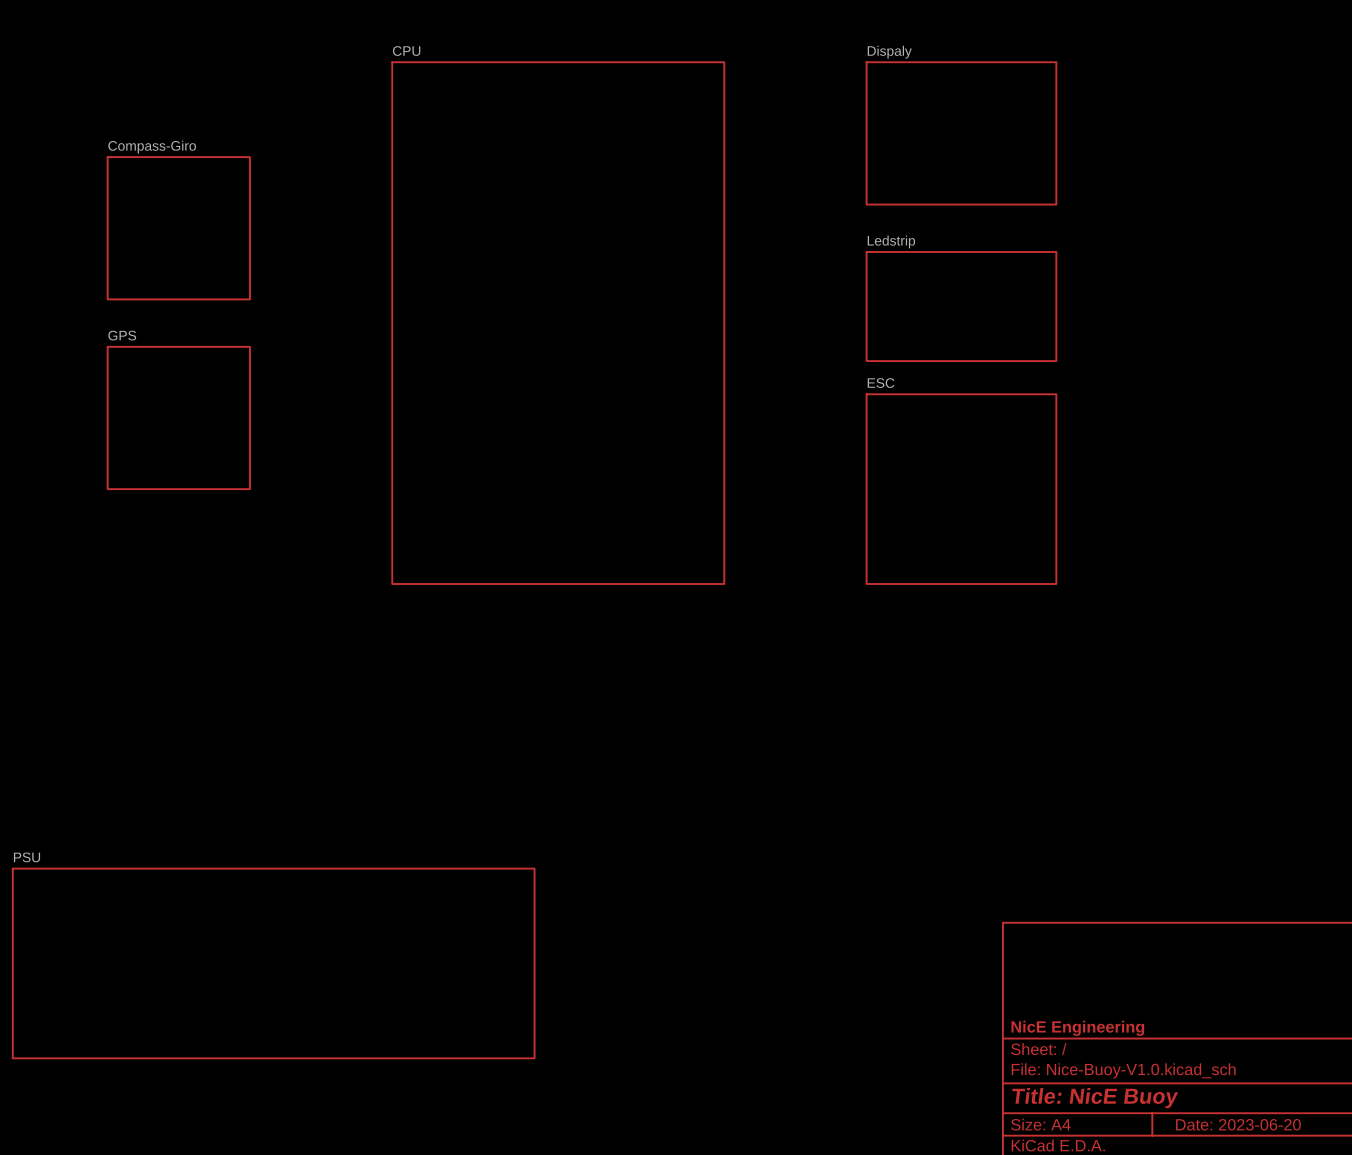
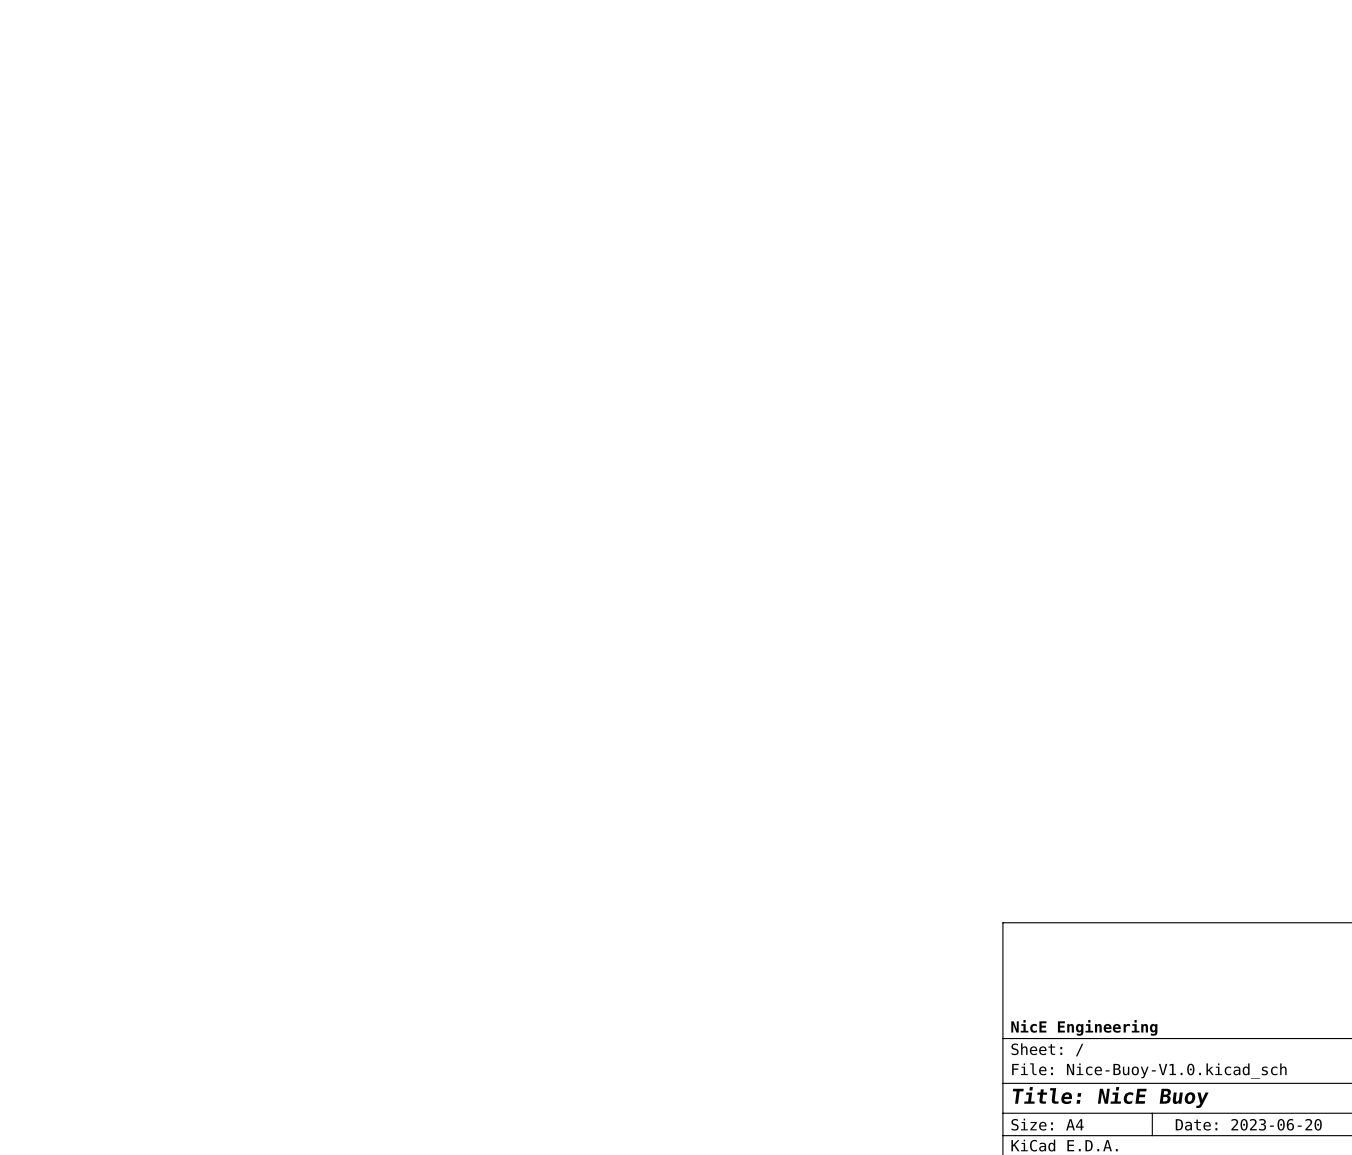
sheet Dispaly: (961, 133) -> none
sheet Compass-Giro: (178, 228) -> none
sheet Ledstrip: (961, 306) -> none
sheet CPU: (558, 323) -> none
sheet GPS: (178, 417) -> none
sheet ESC: (961, 489) -> none
sheet PSU: (273, 963) -> none

